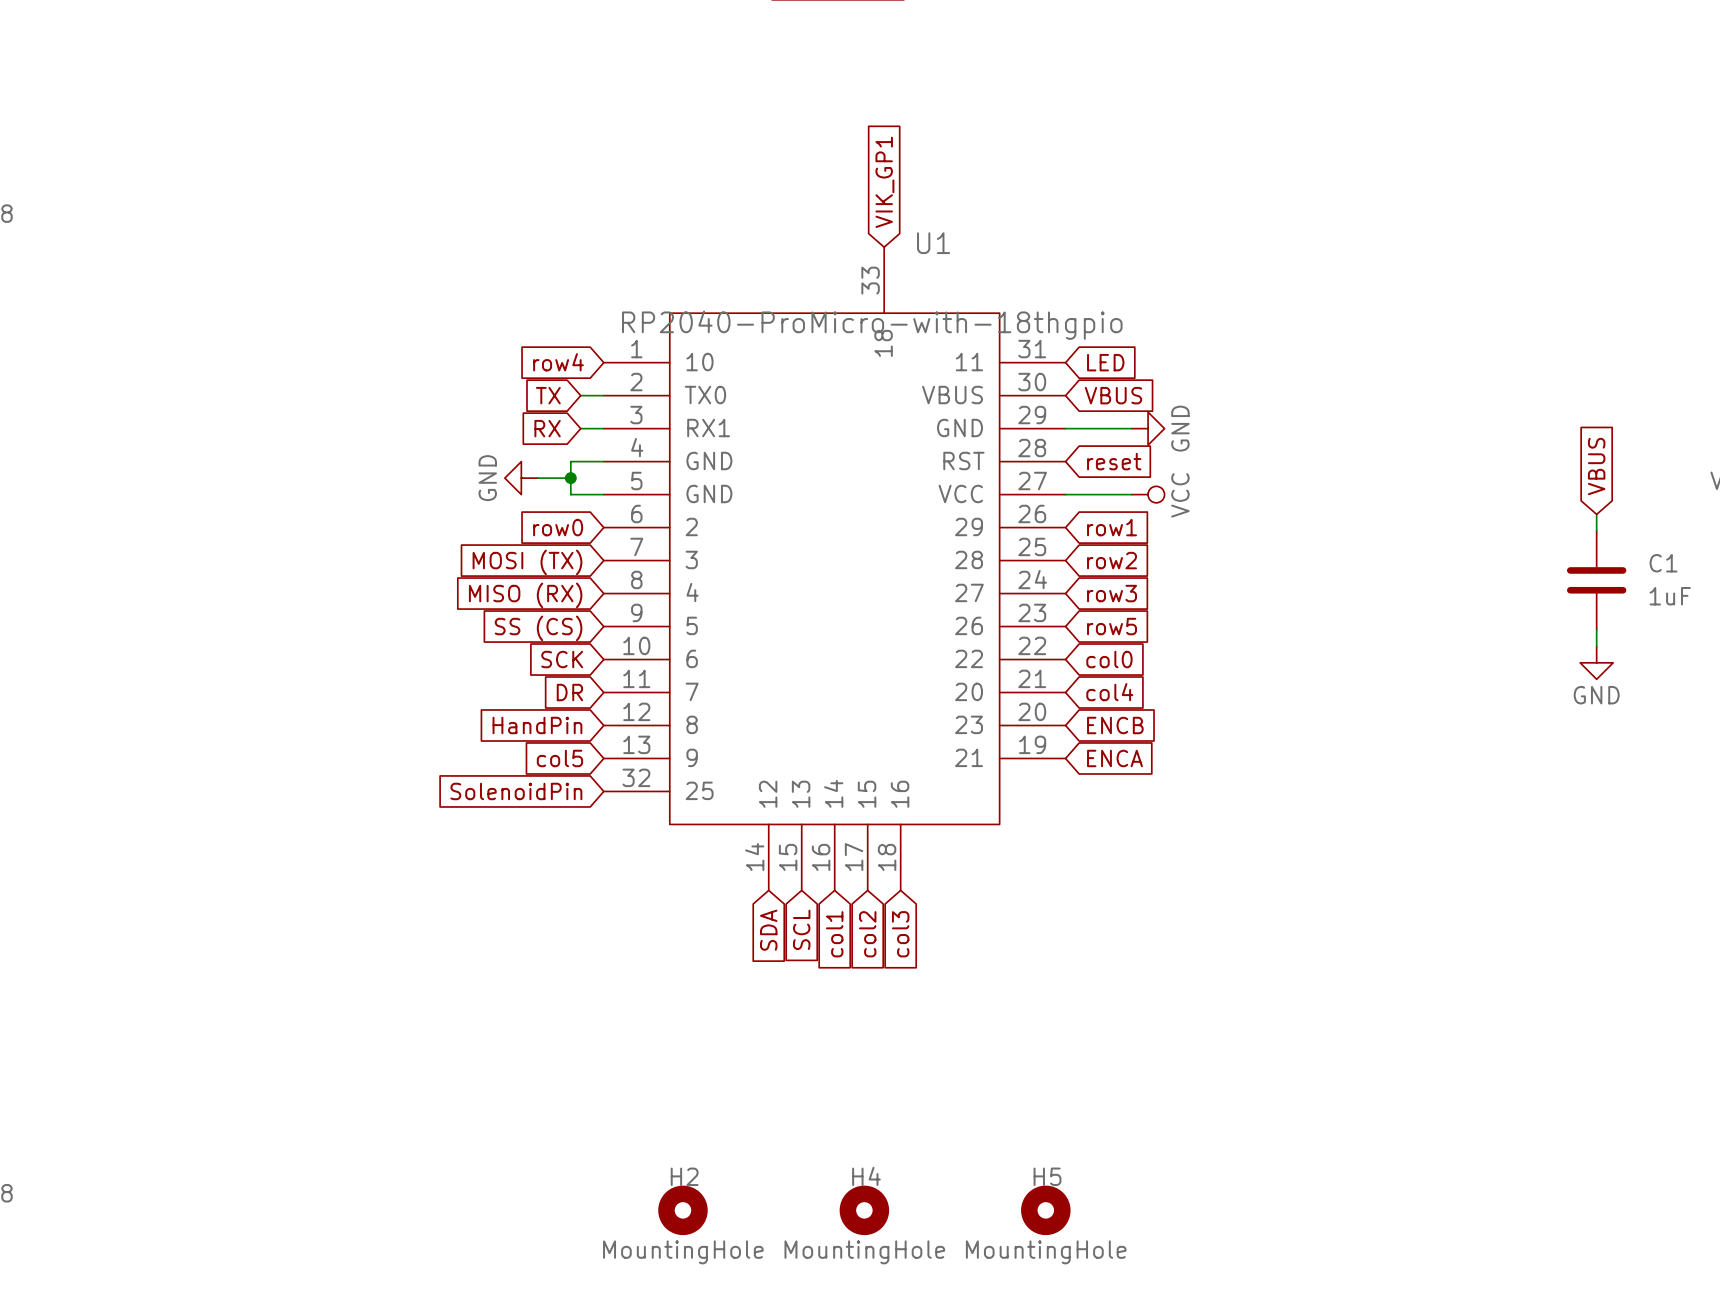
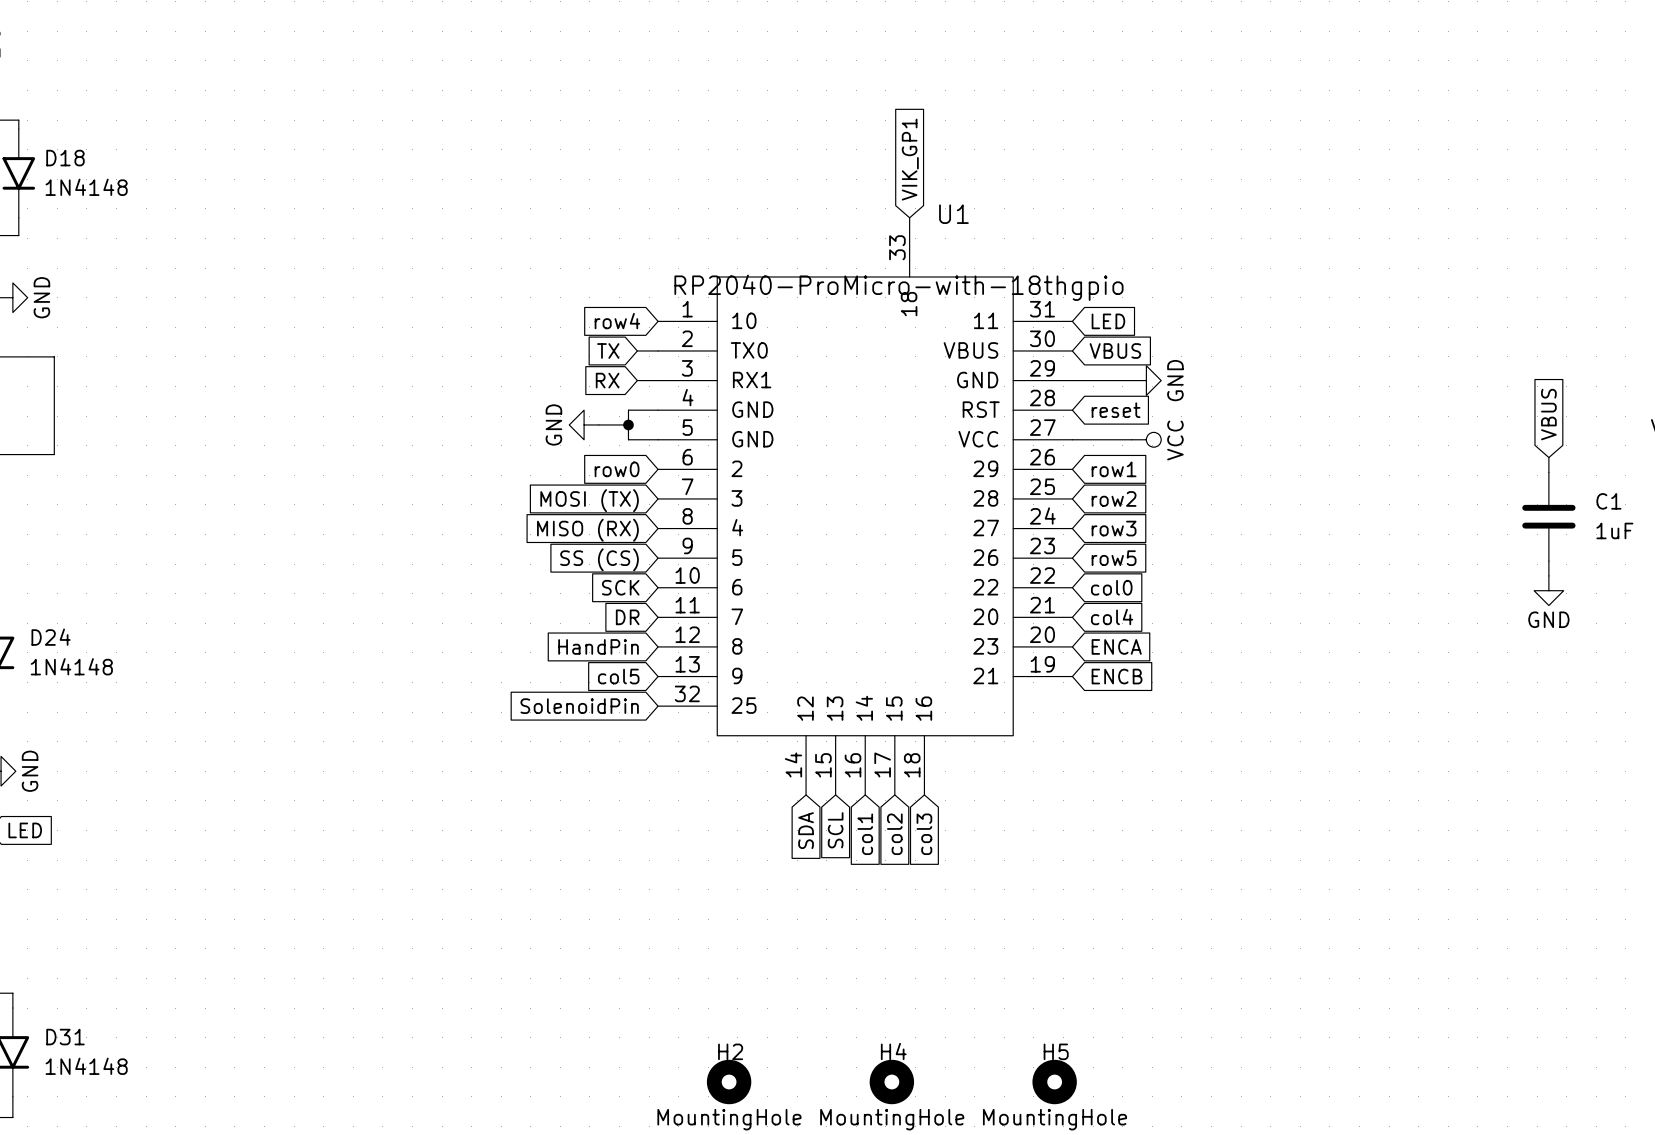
global label: ENCB (1115, 725) -> ENCA (1116, 646)
global label: ENCA (1114, 758) -> ENCB (1117, 676)

